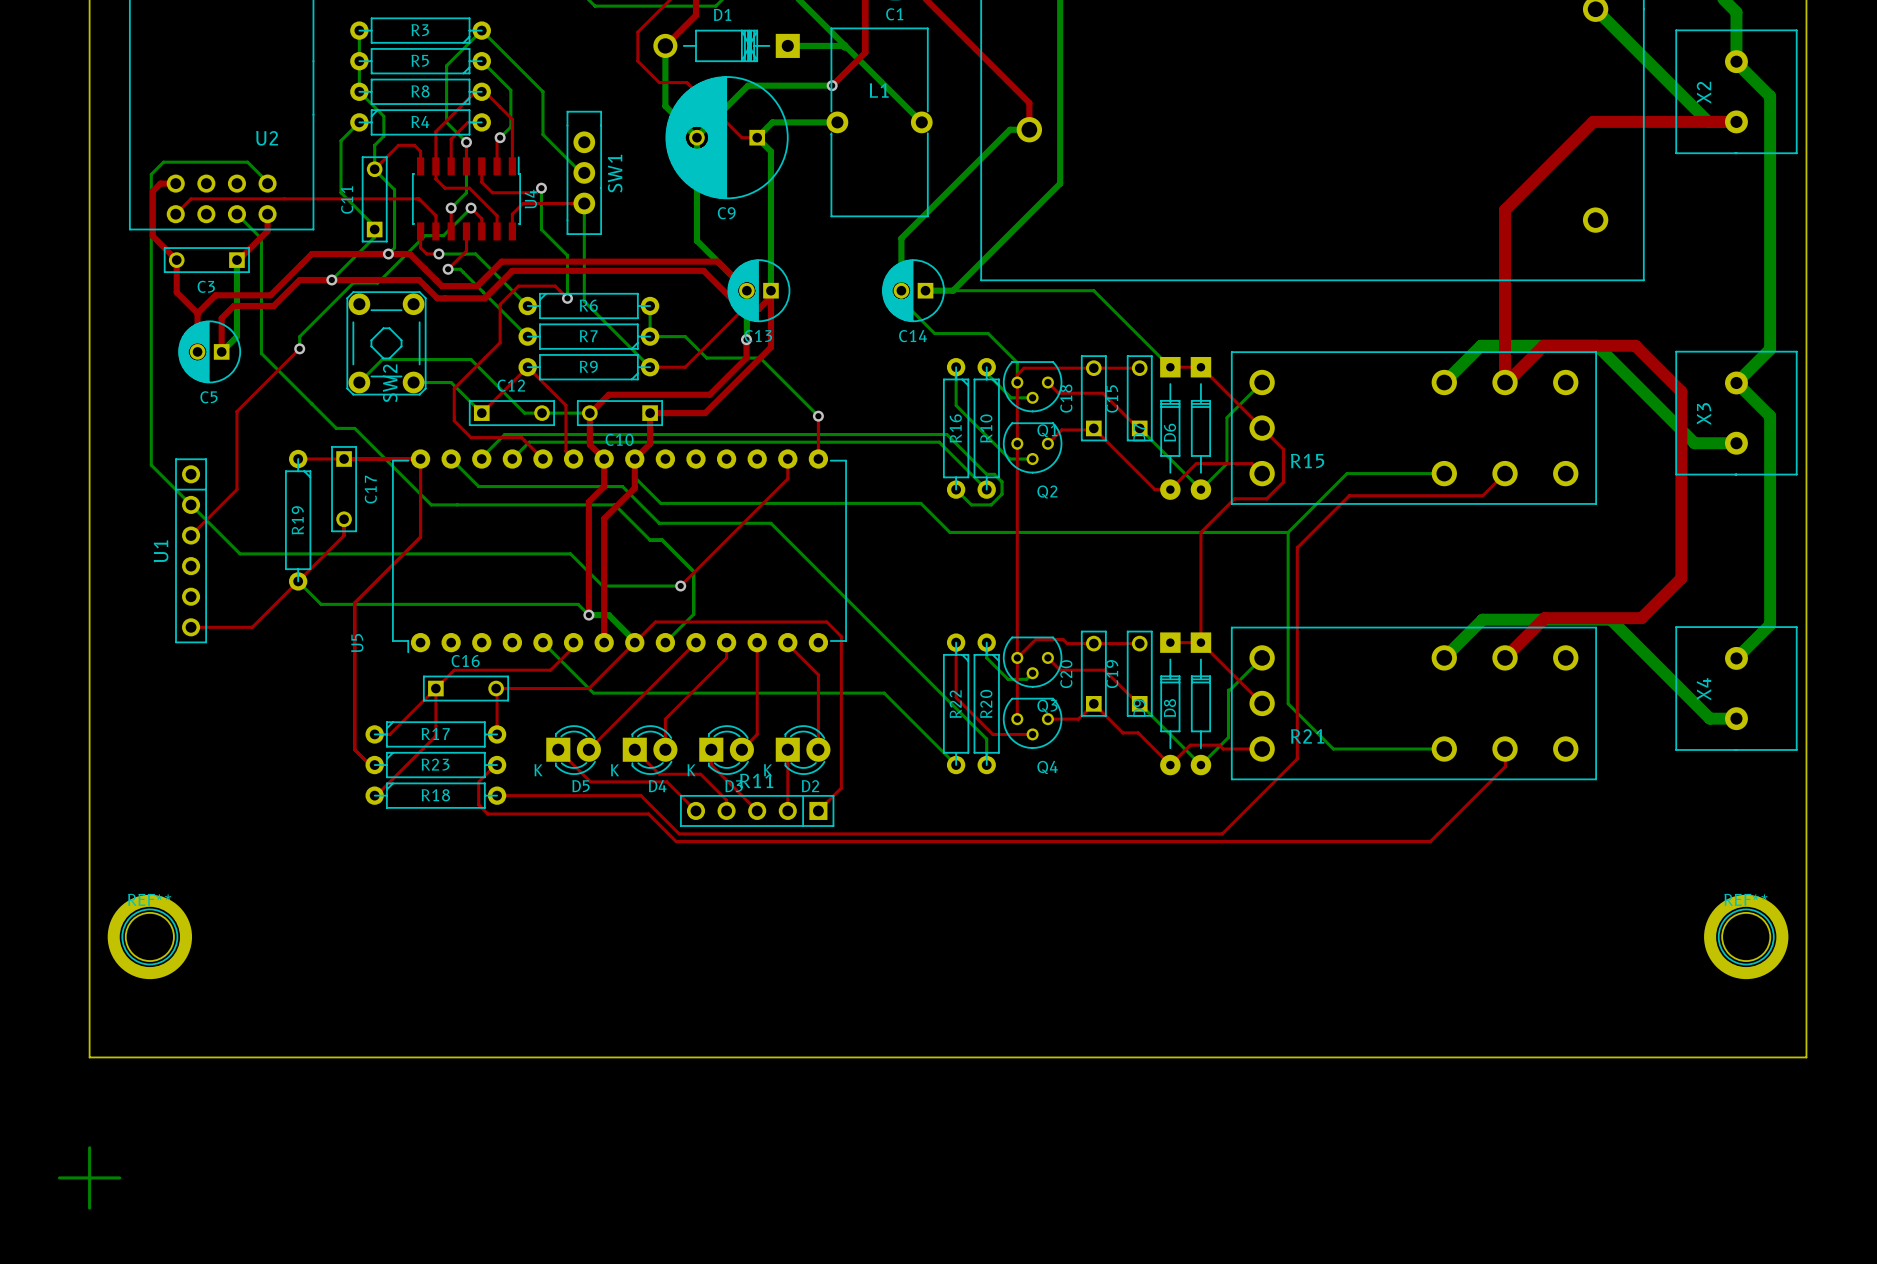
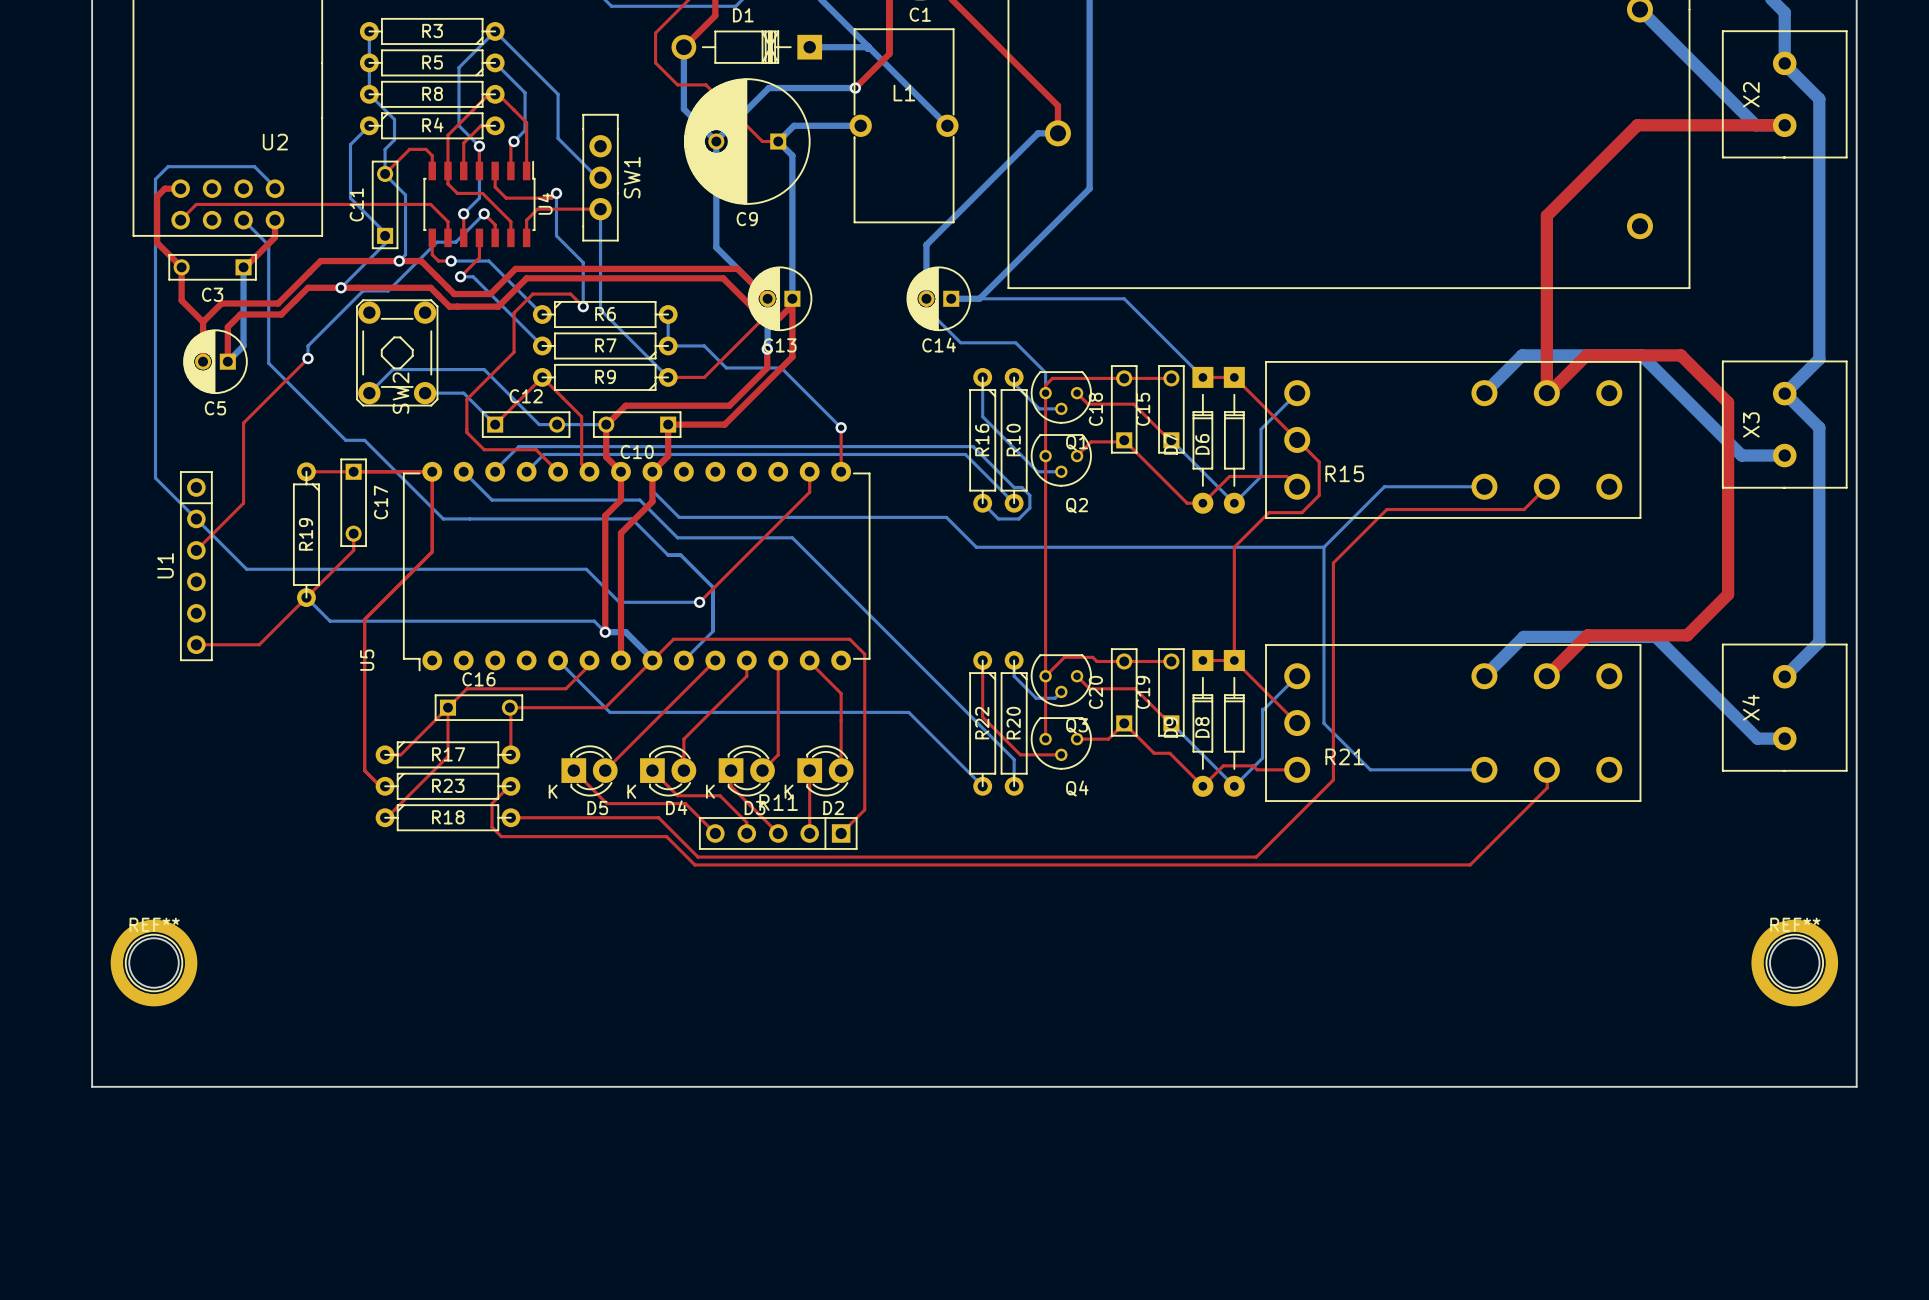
bottom track: (89, 1147) (89, 1208) -> none
bottom track: (59, 1177) (119, 1177) -> none

